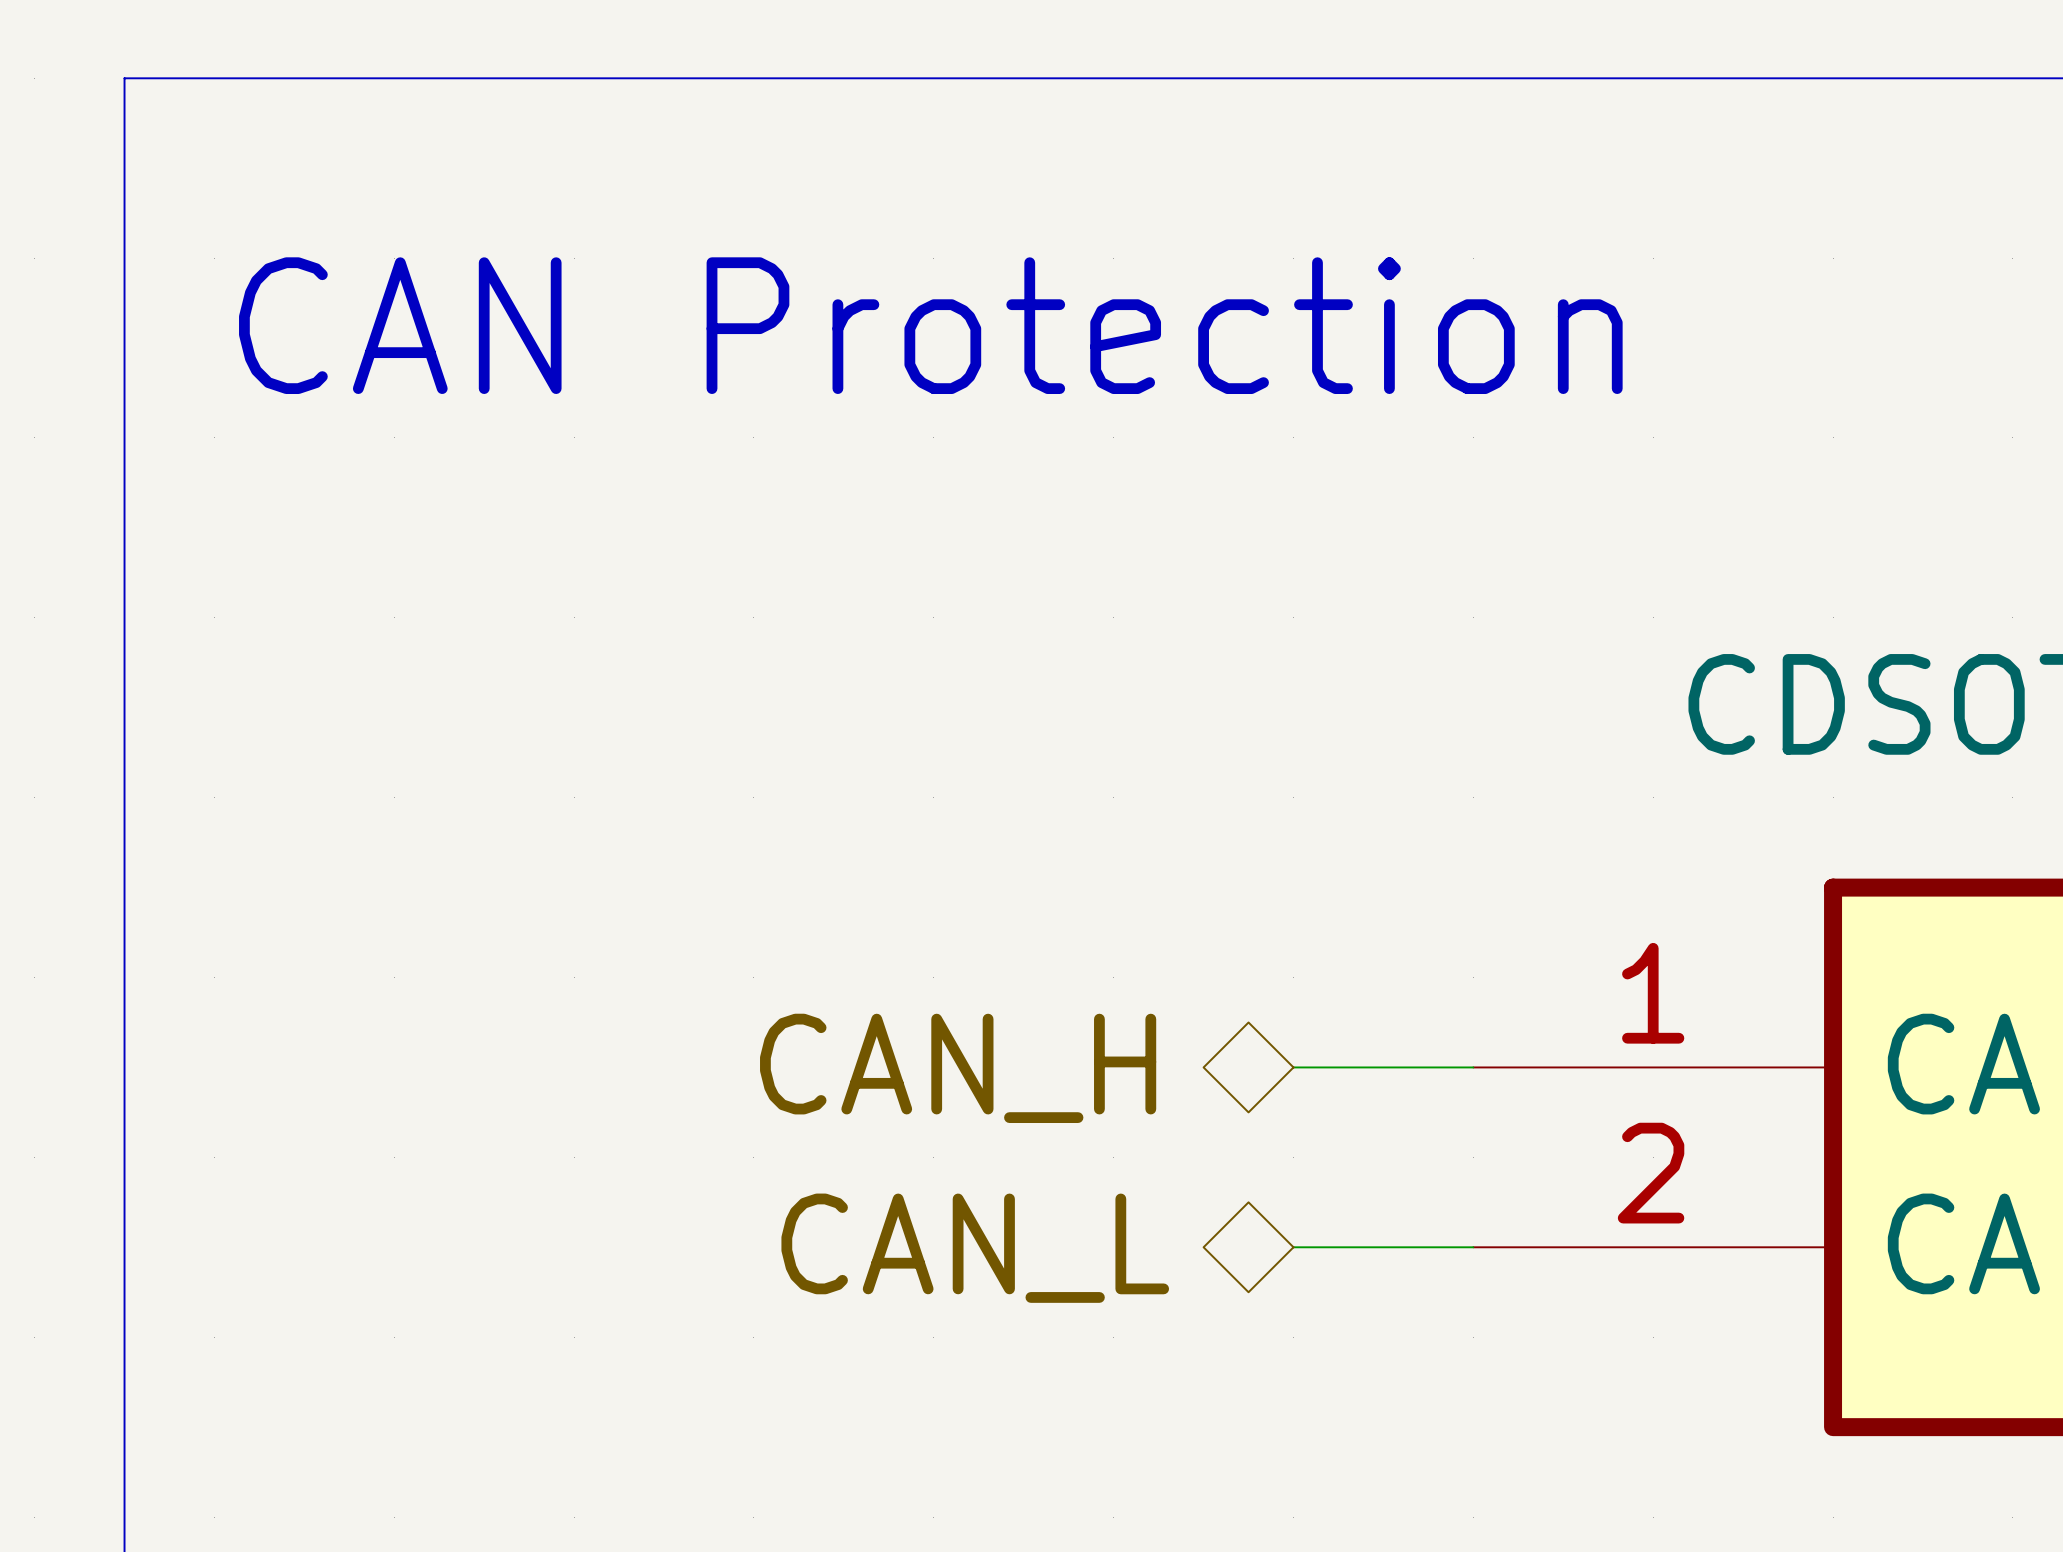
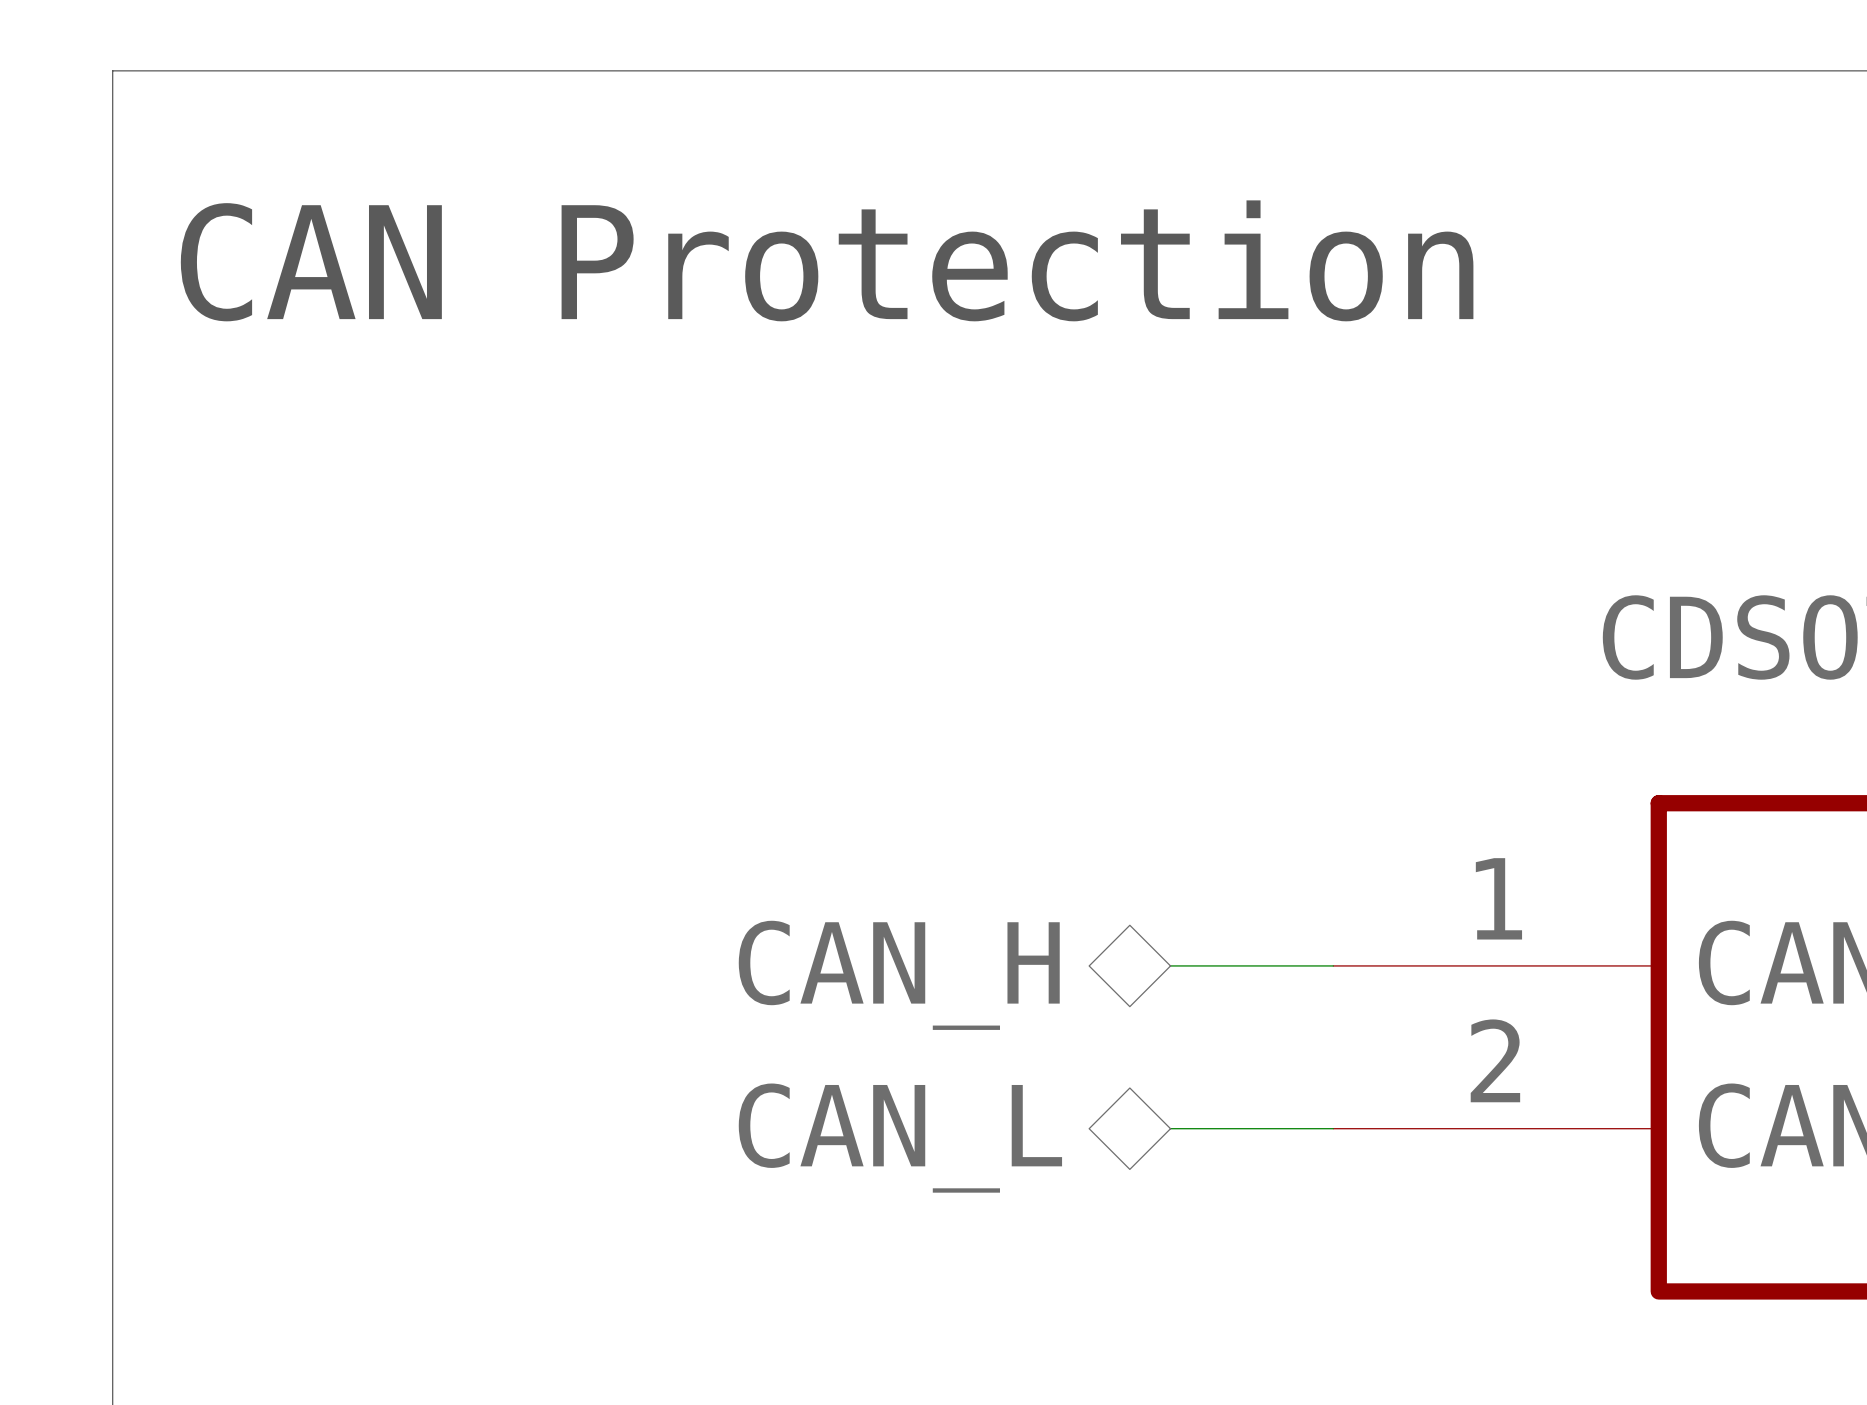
text position: CAN Protection (930, 325) -> CAN Protection (827, 260)

